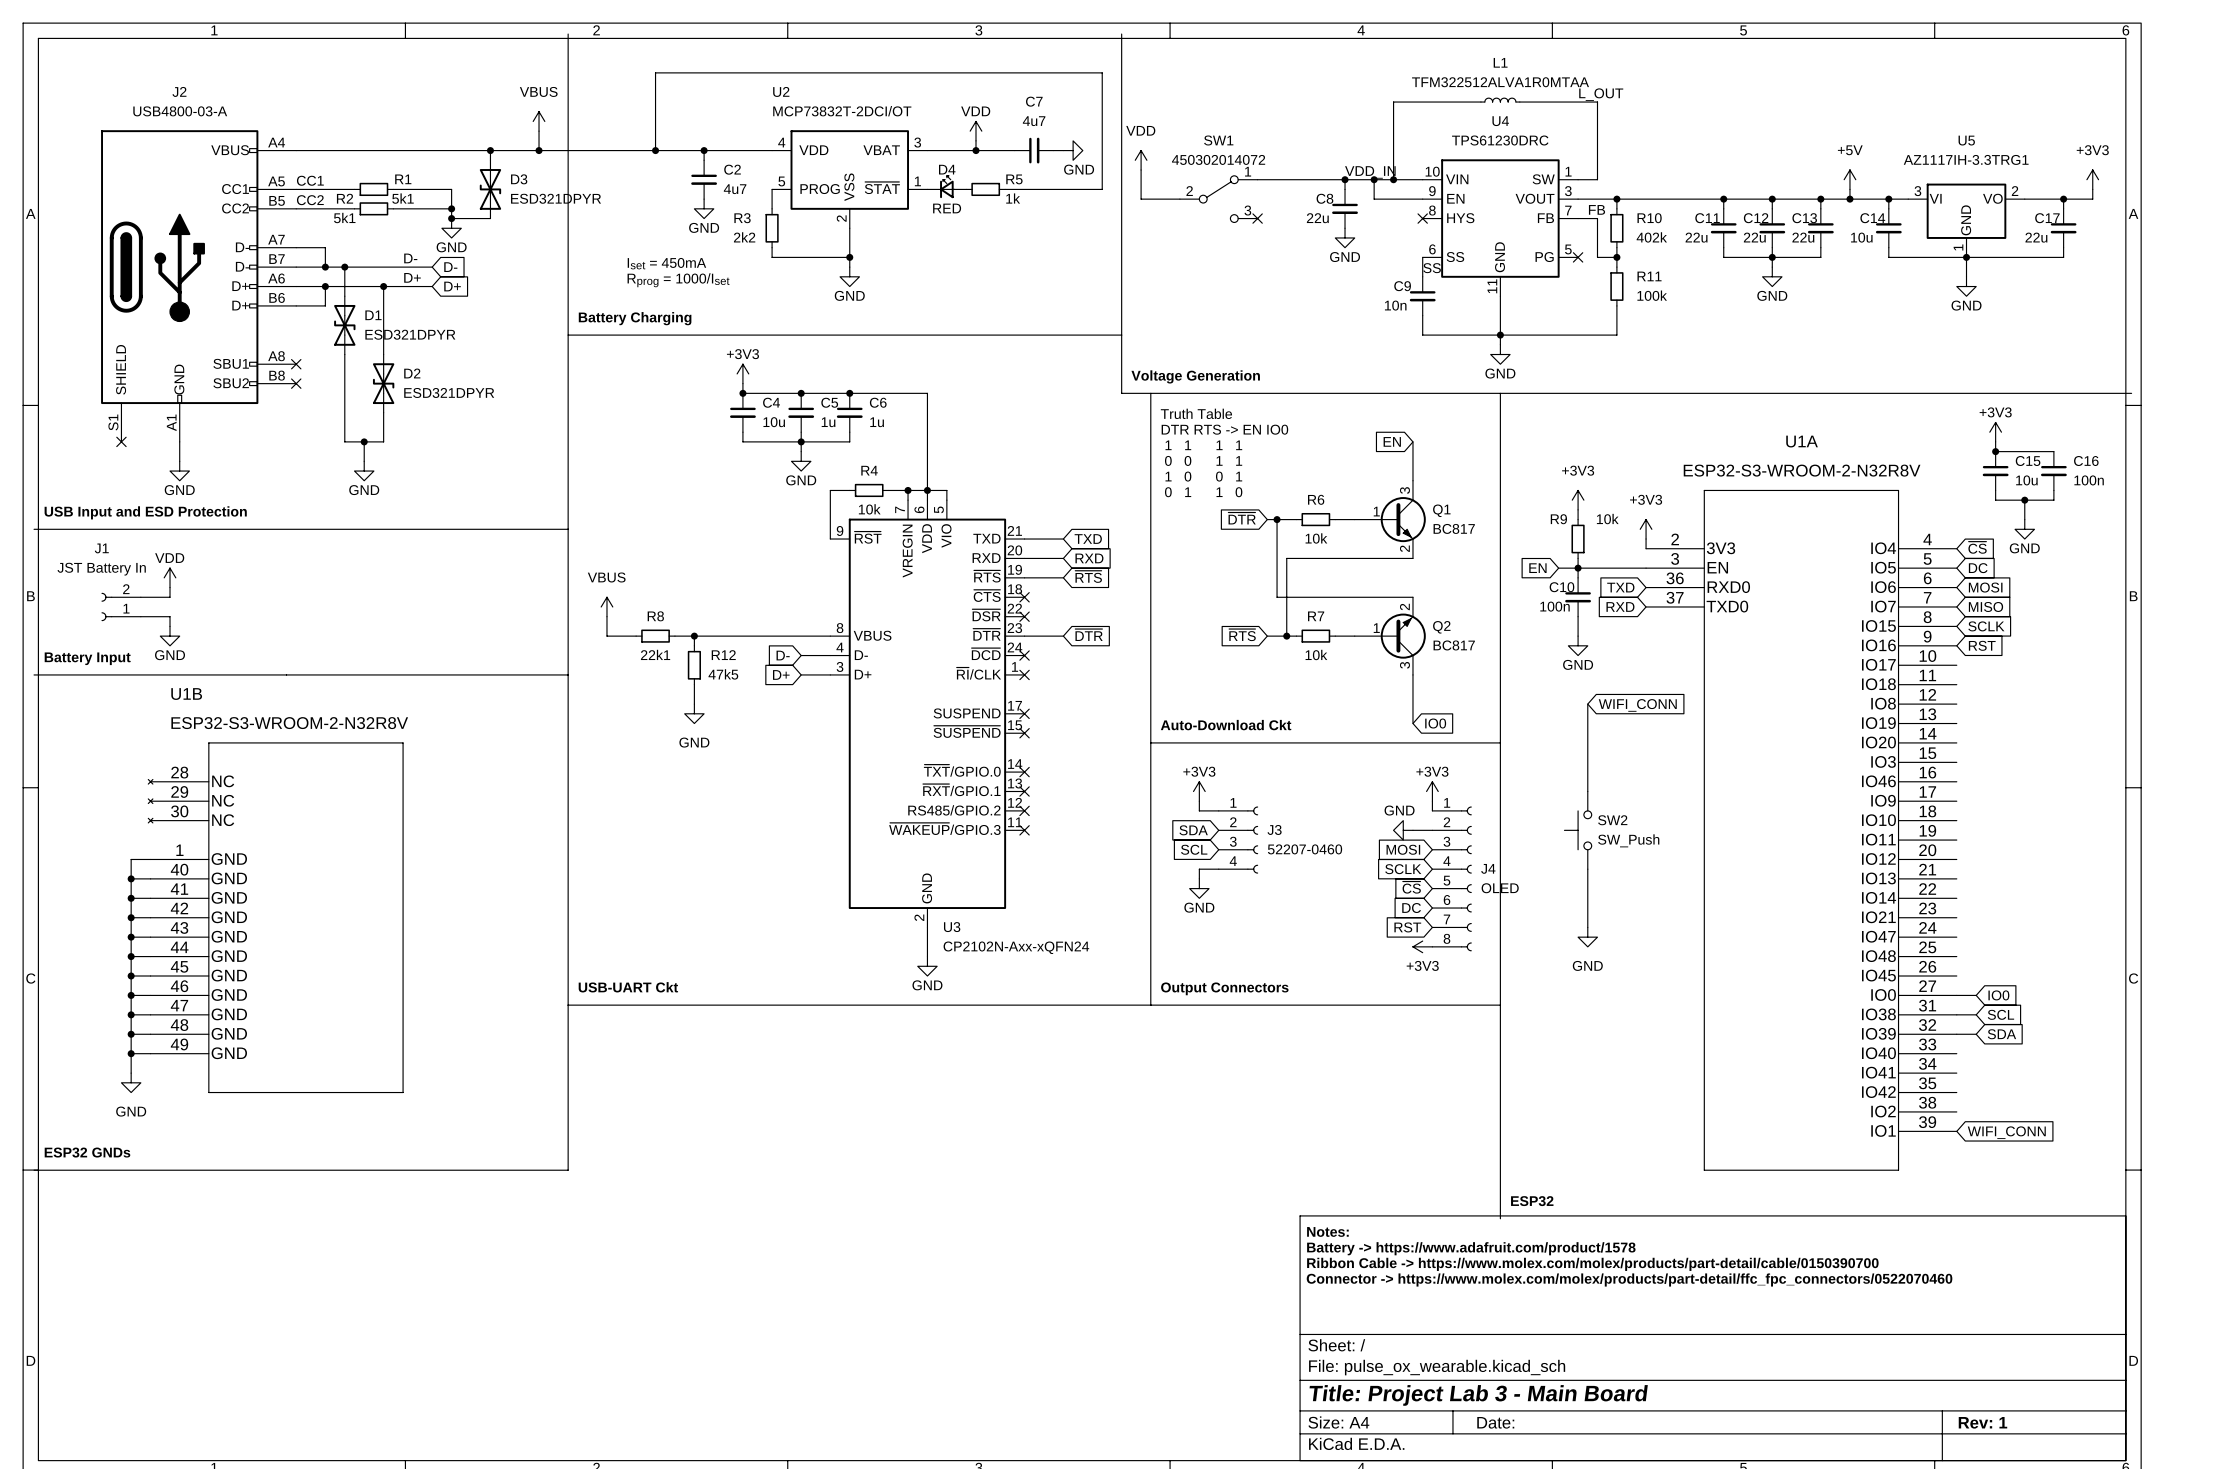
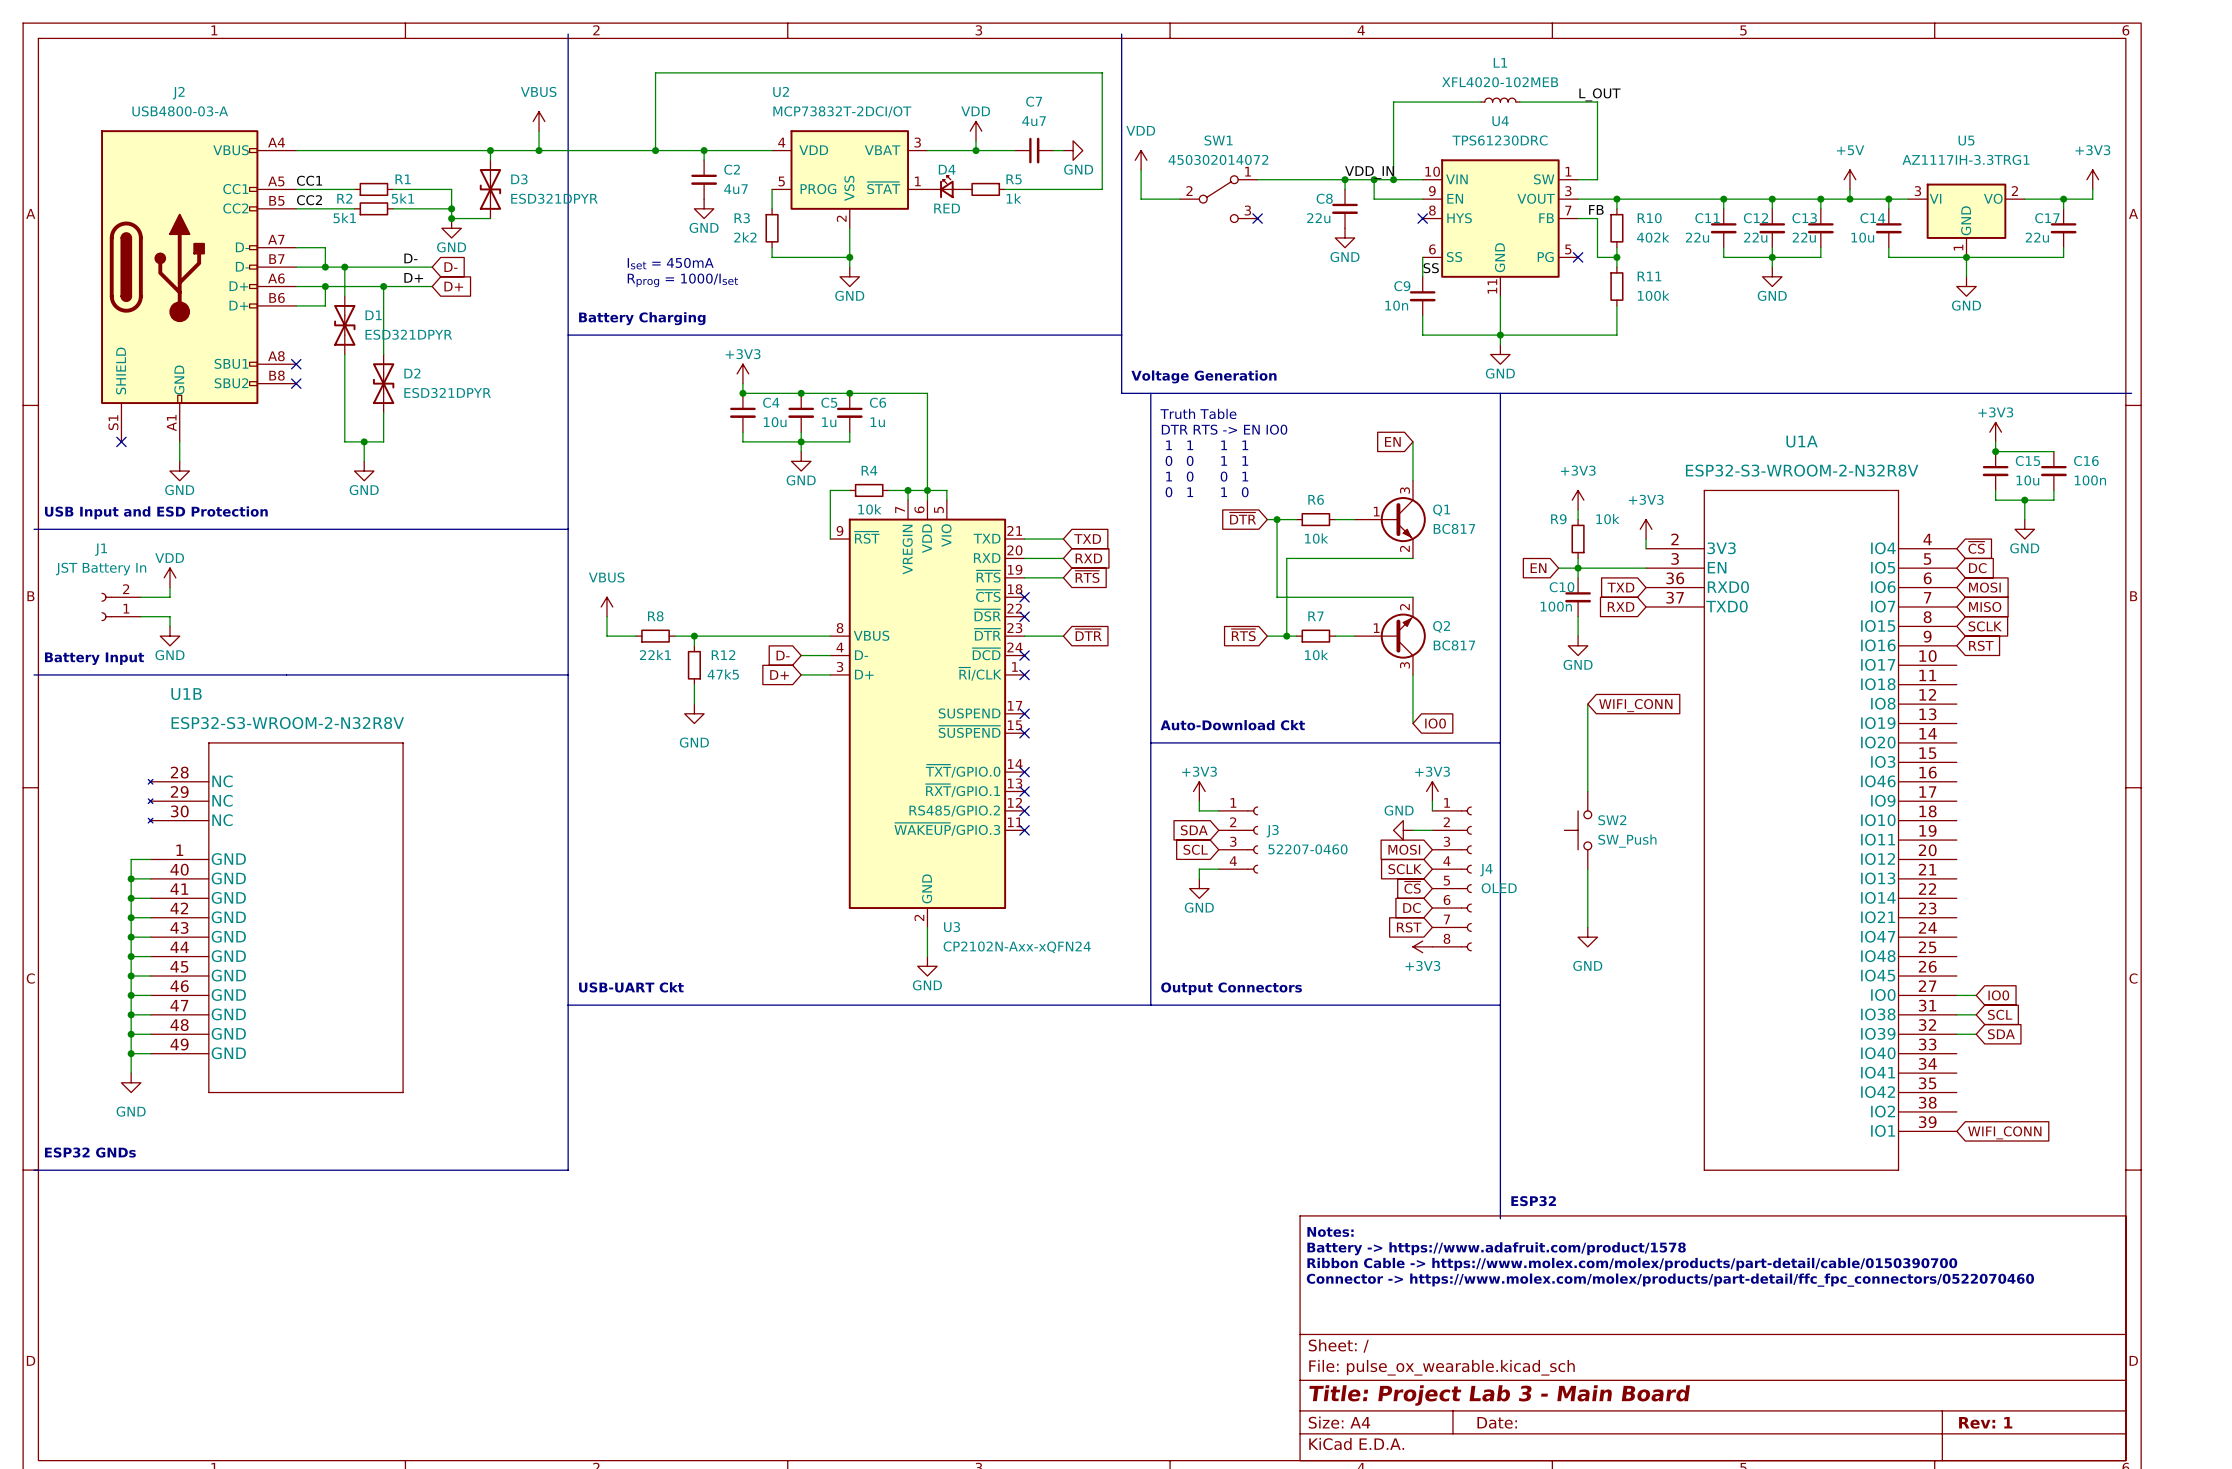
L1 value: TFM322512ALVA1R0MTAA (1500, 82) -> XFL4020-102MEB (1500, 82)

